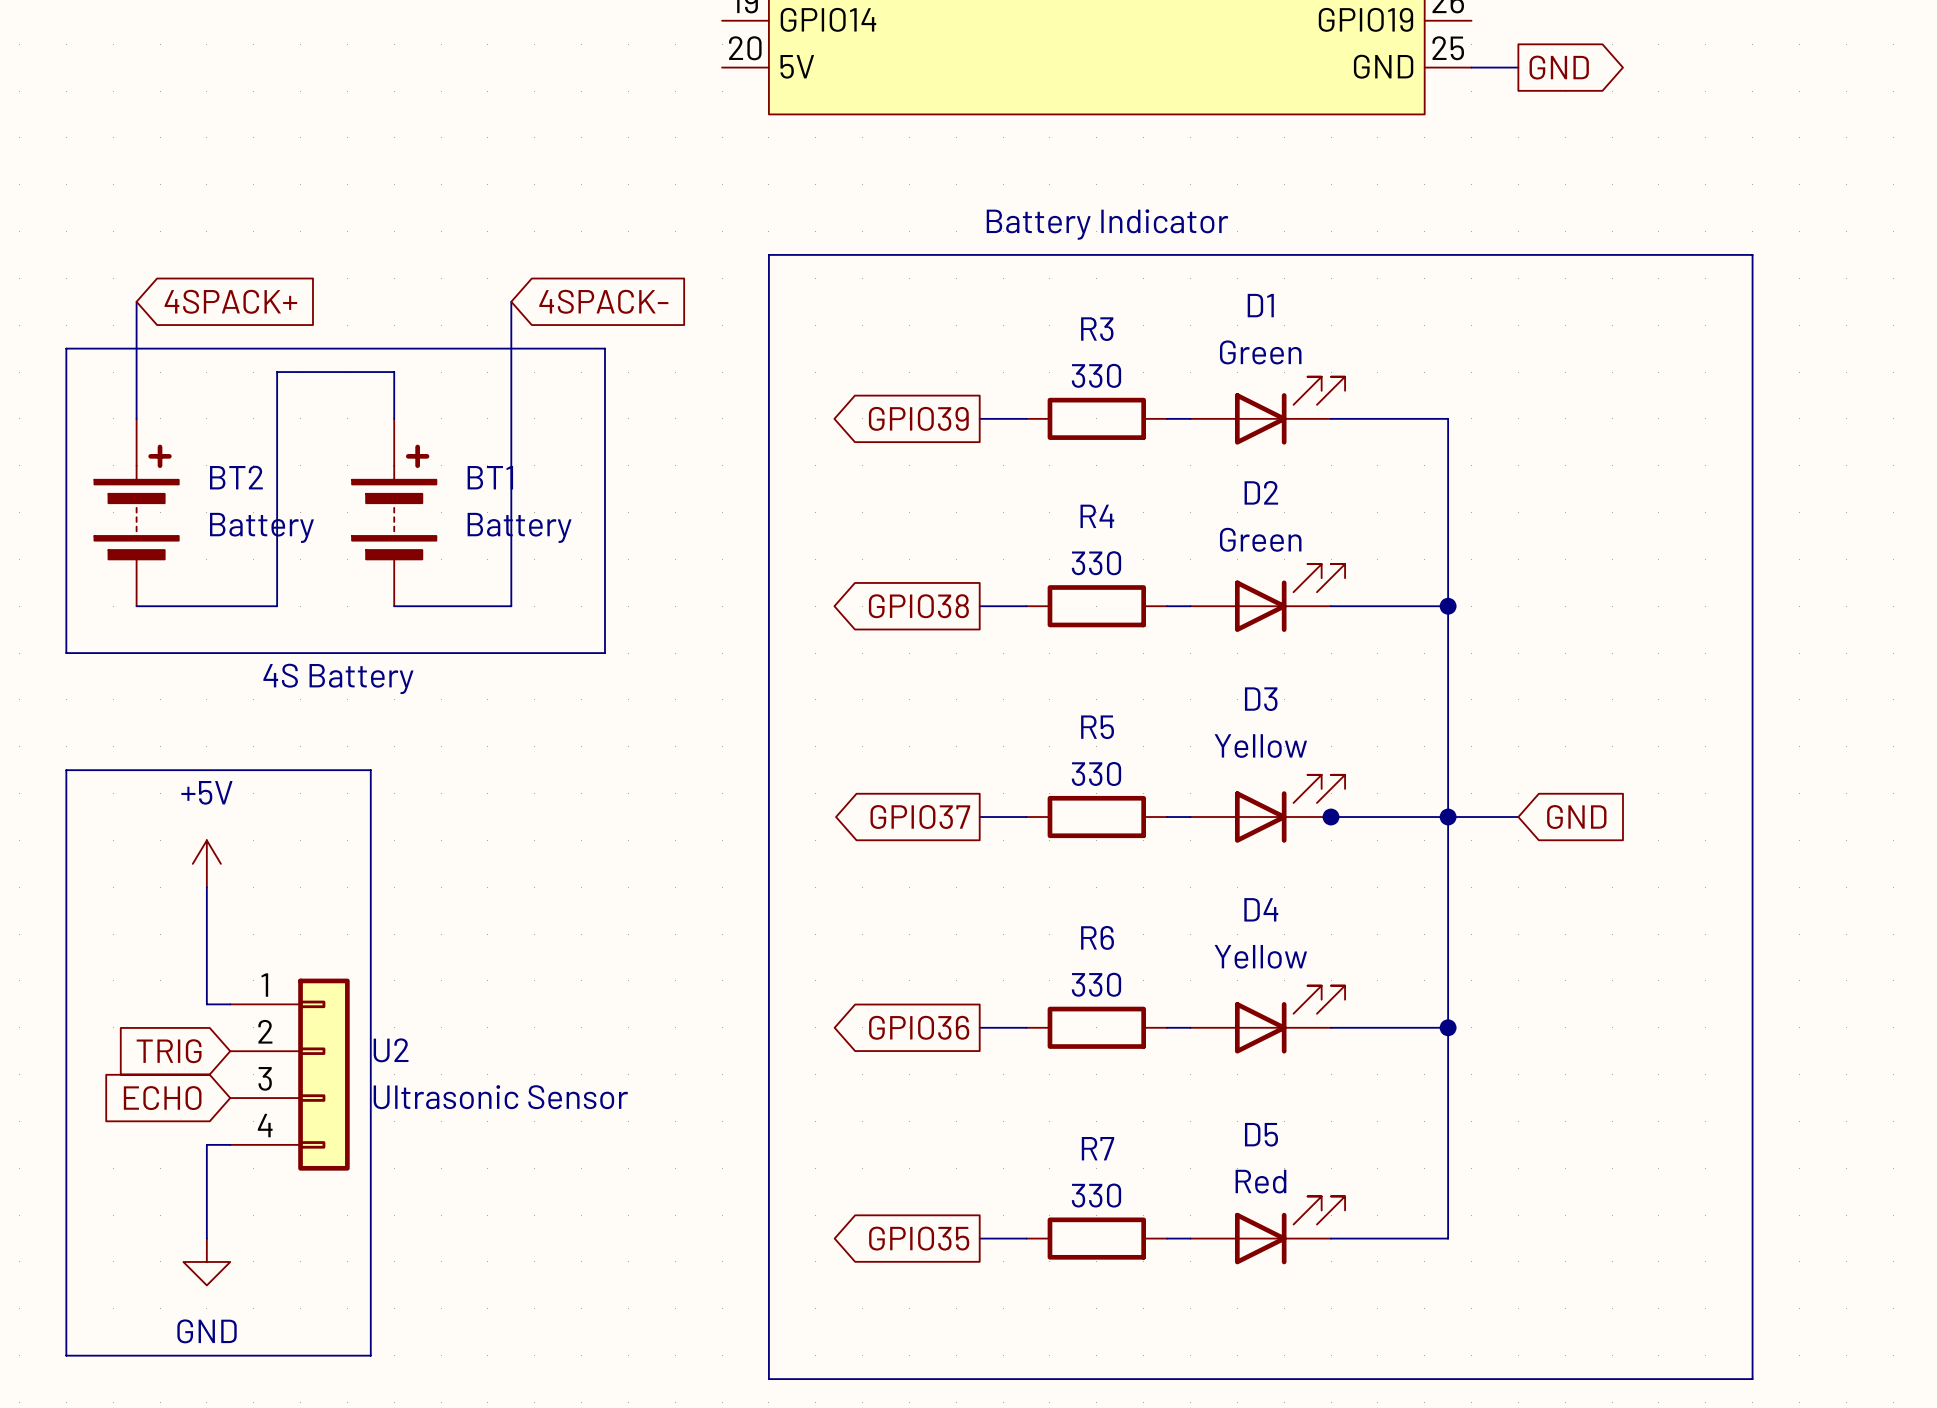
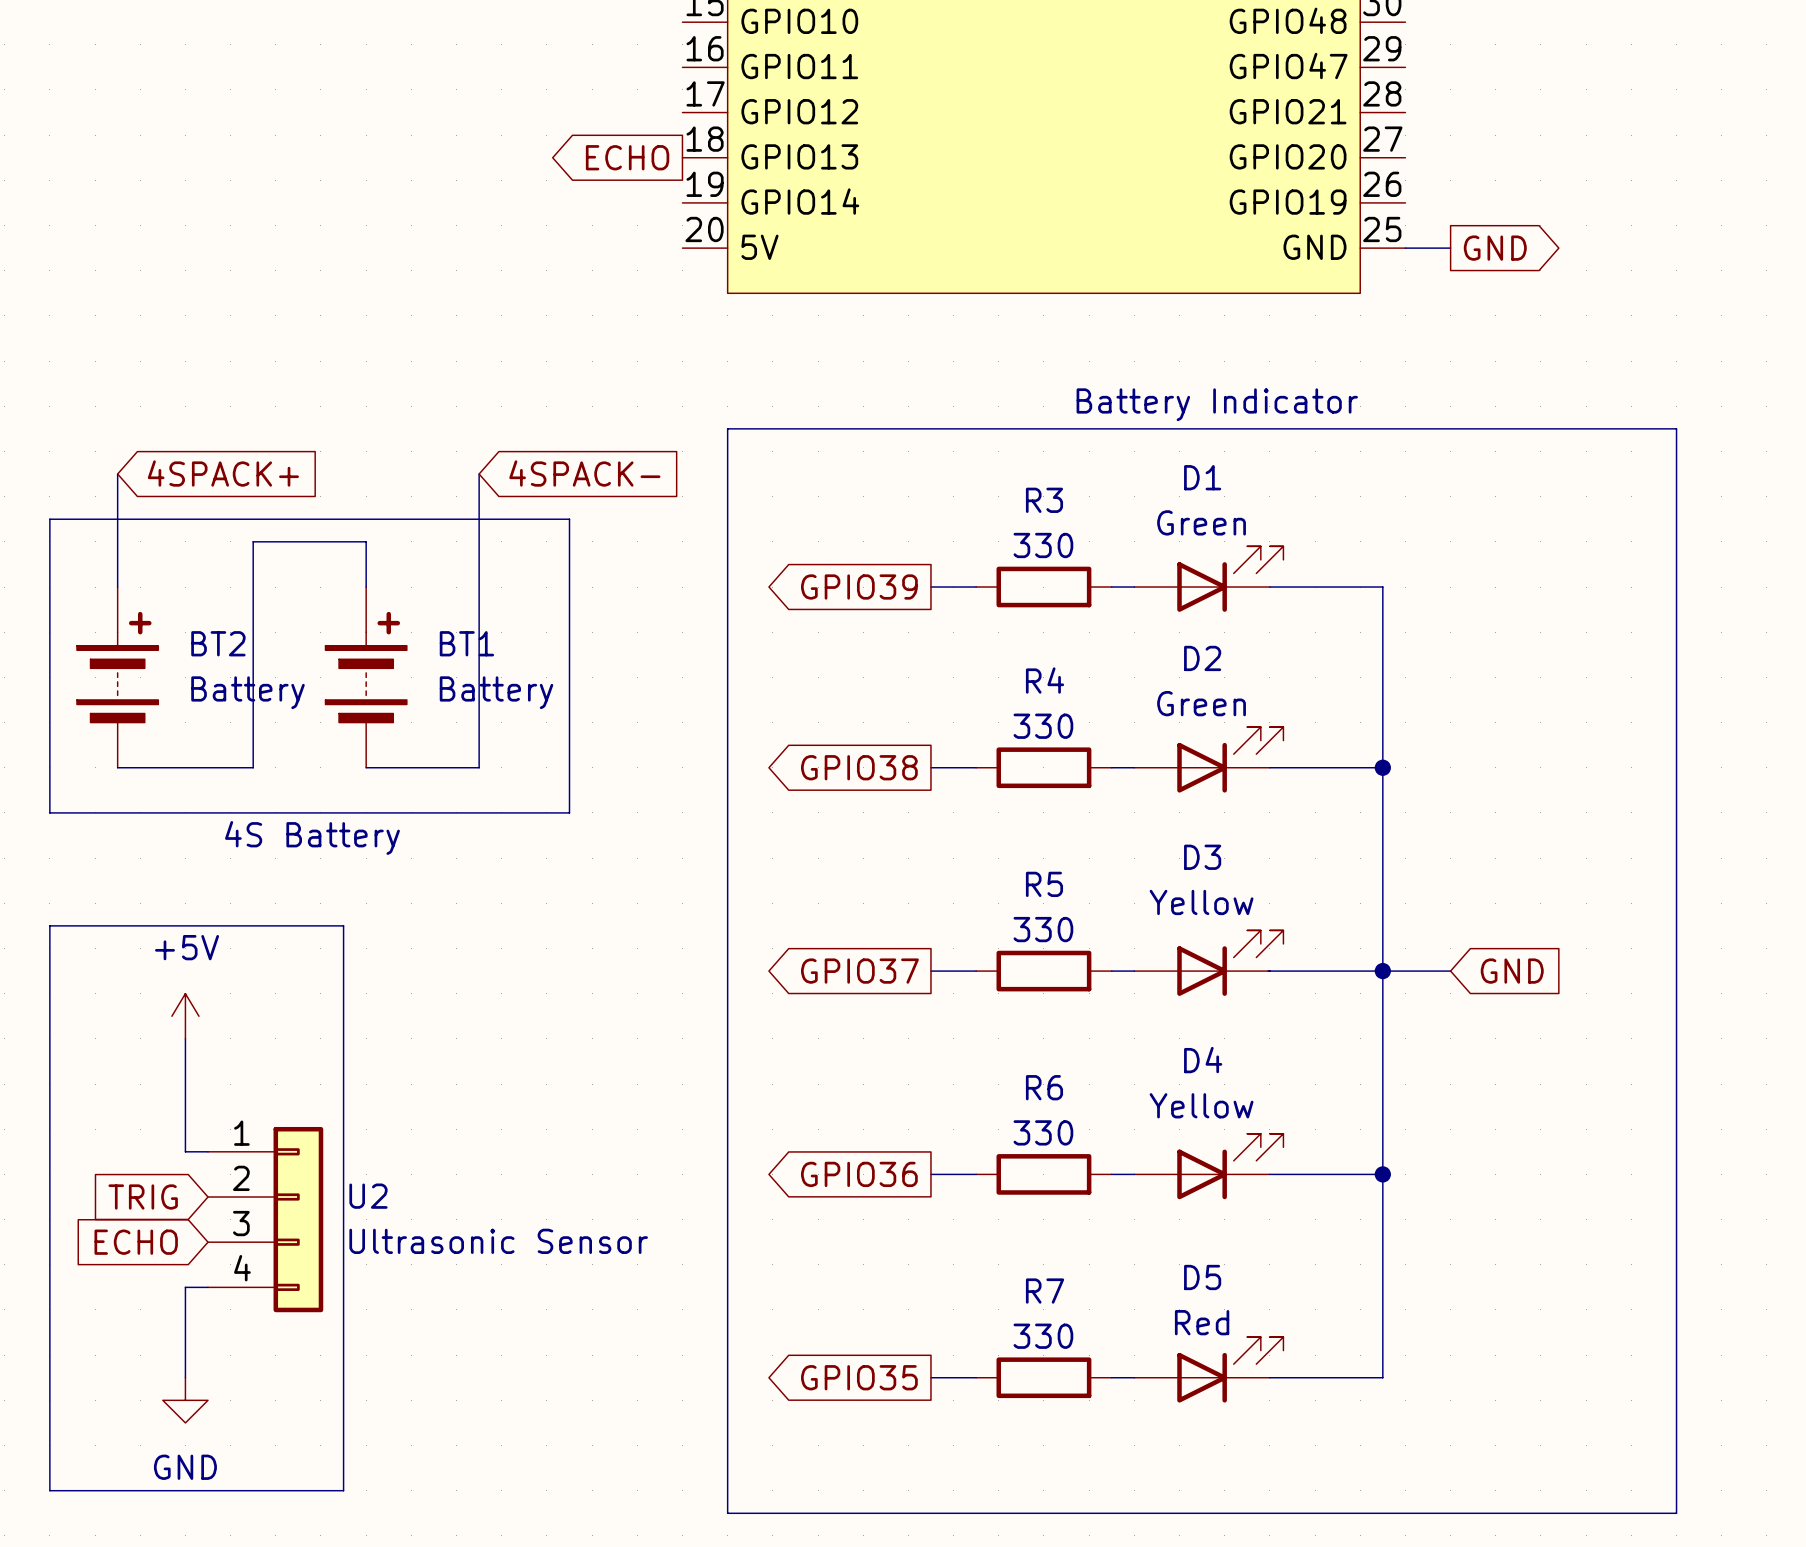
text position: Battery Indicator (1107, 224) -> Battery Indicator (1217, 404)
junction: (1331, 817) -> none

